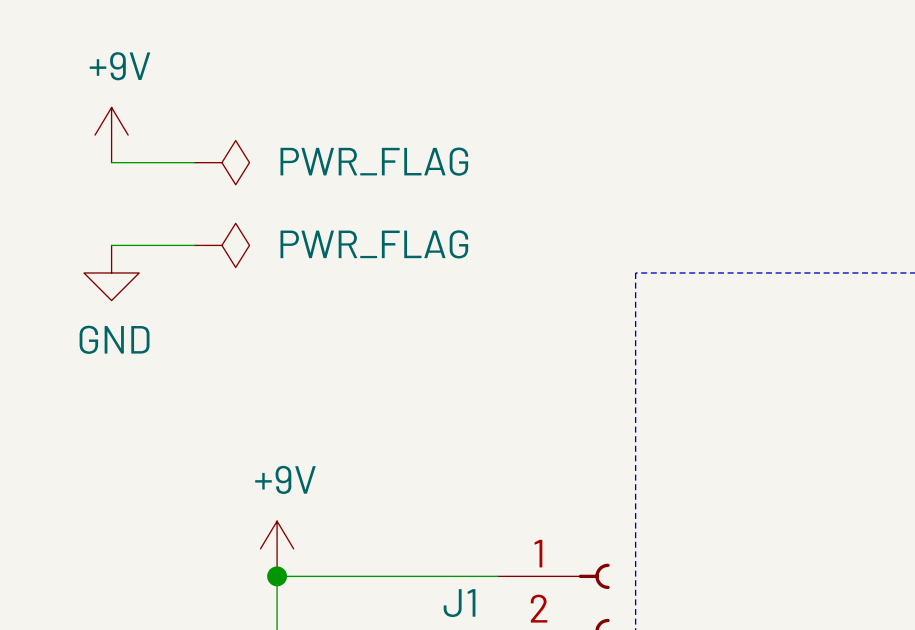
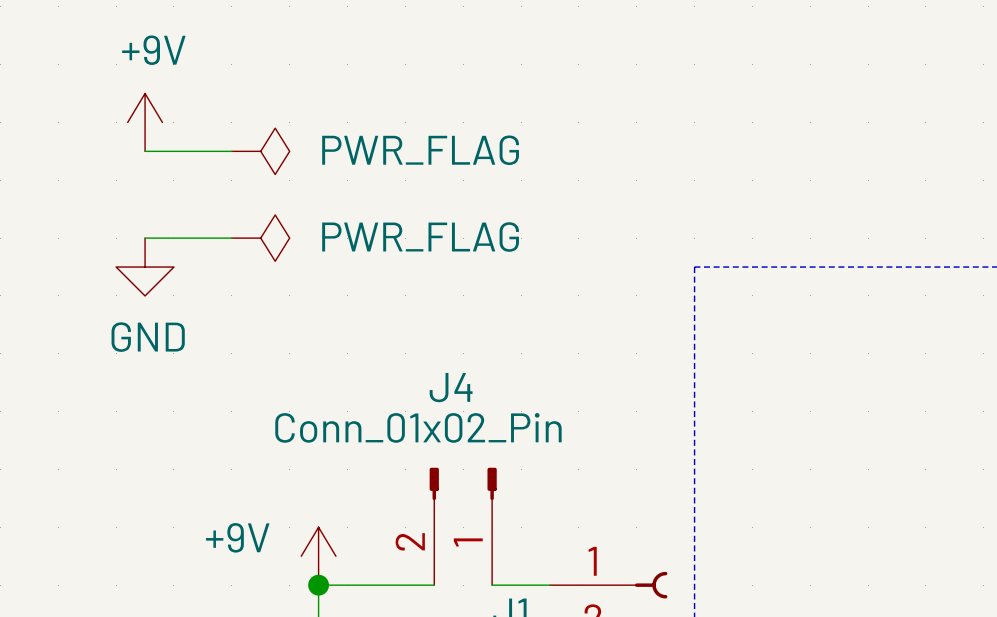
power symbol text position: +9V (285, 479) -> +9V (237, 537)
J4: none -> Conn_01x02_Pin (463, 526)
wire: (387, 576) (442, 576) -> none

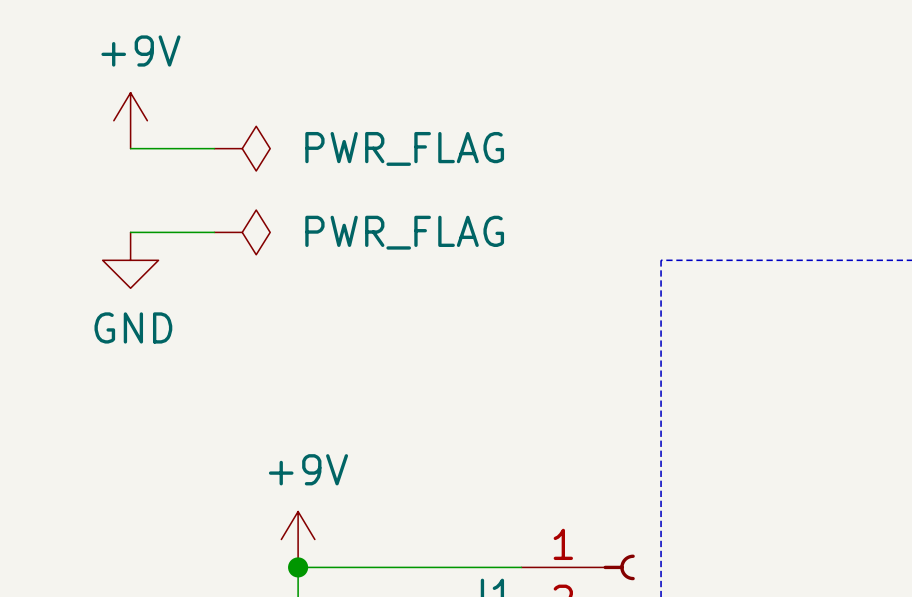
J4: Conn_01x02_Pin (463, 526) -> none
power symbol text position: +9V (237, 537) -> +9V (308, 469)
wire: none -> (409, 567) (465, 567)

